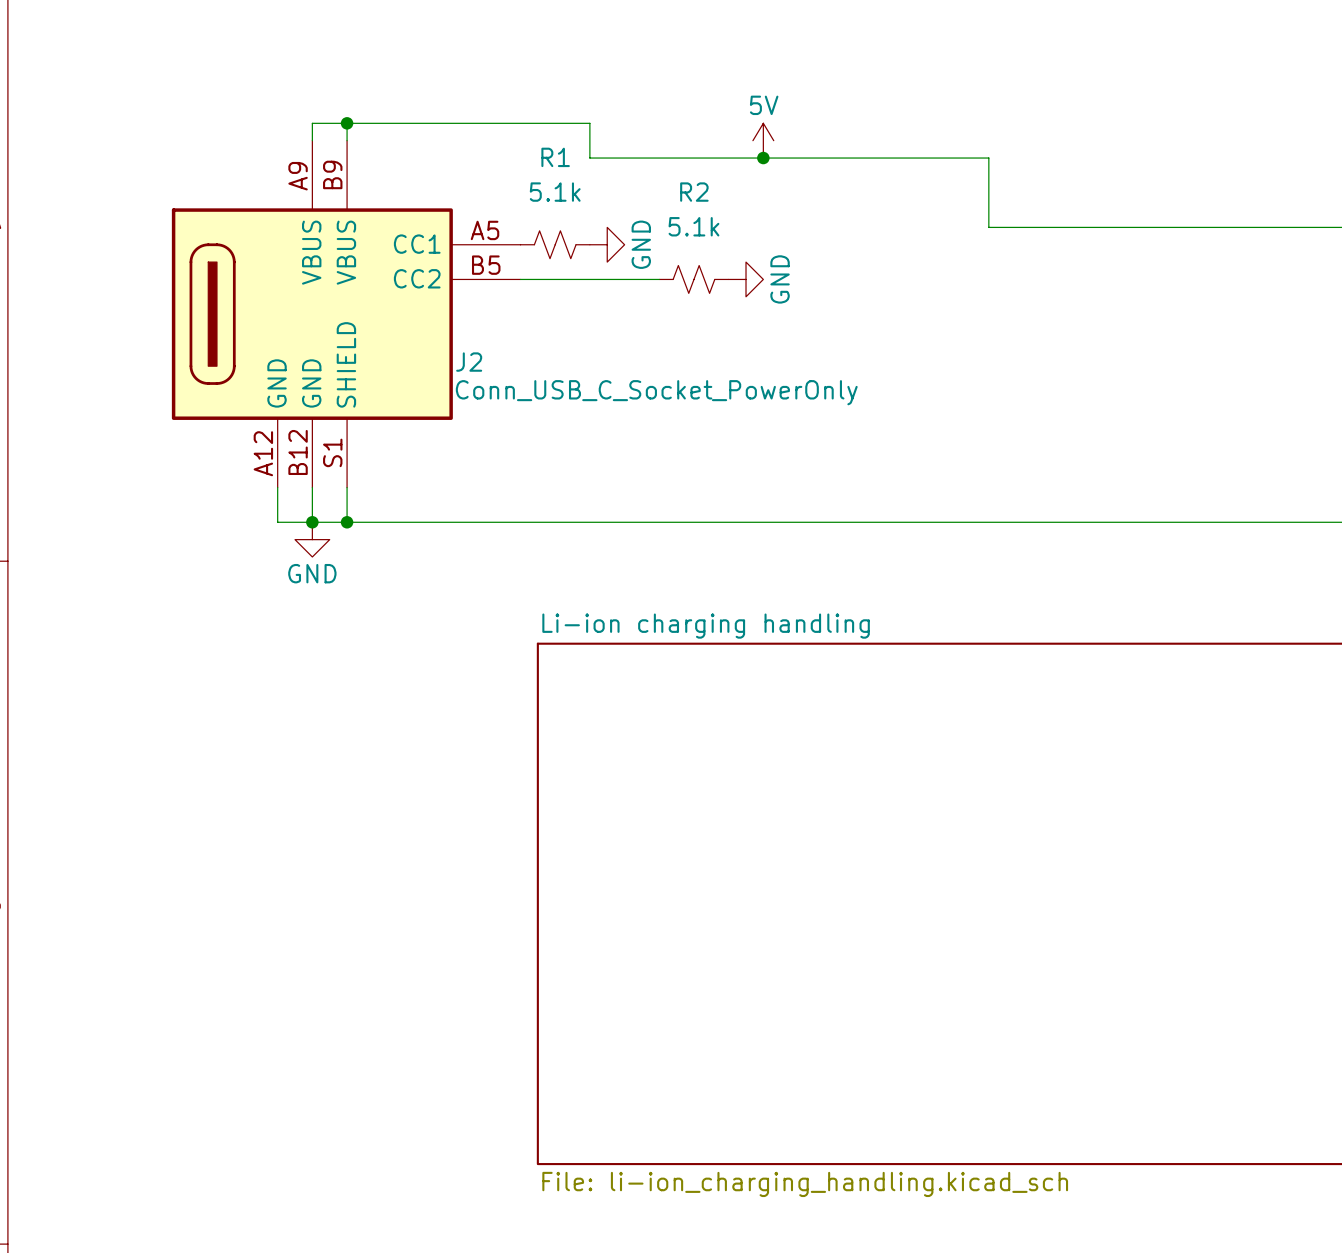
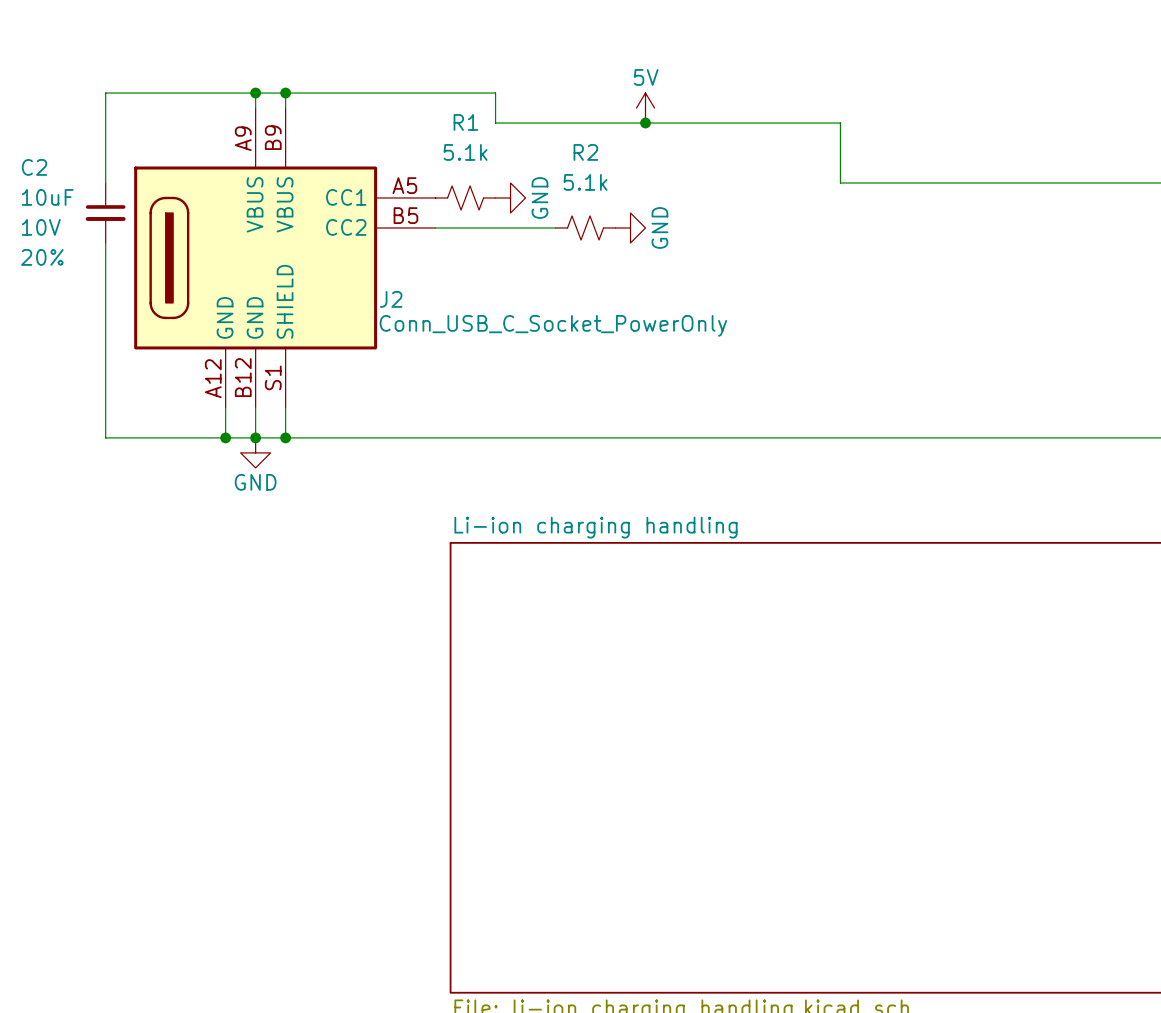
wire: none -> (255, 93) (105, 93) (105, 182)
junction: none -> (255, 93)
C2: none -> 10uF (105, 212)
wire: none -> (105, 242) (105, 437) (225, 437)
junction: none -> (225, 437)

